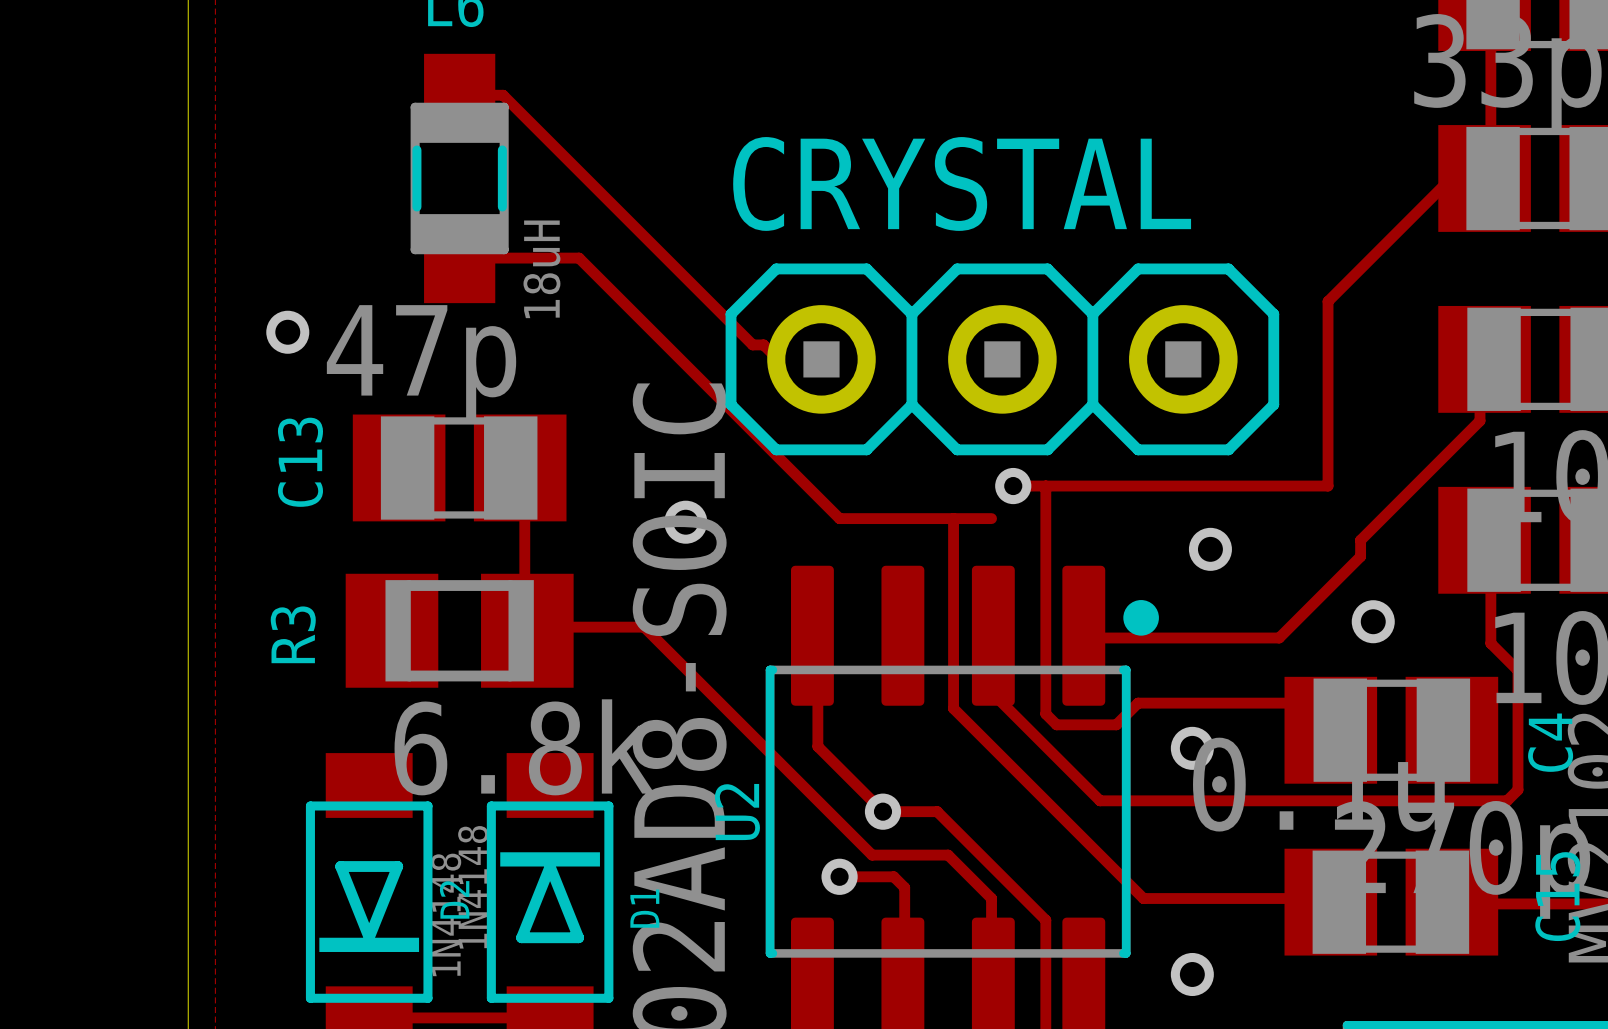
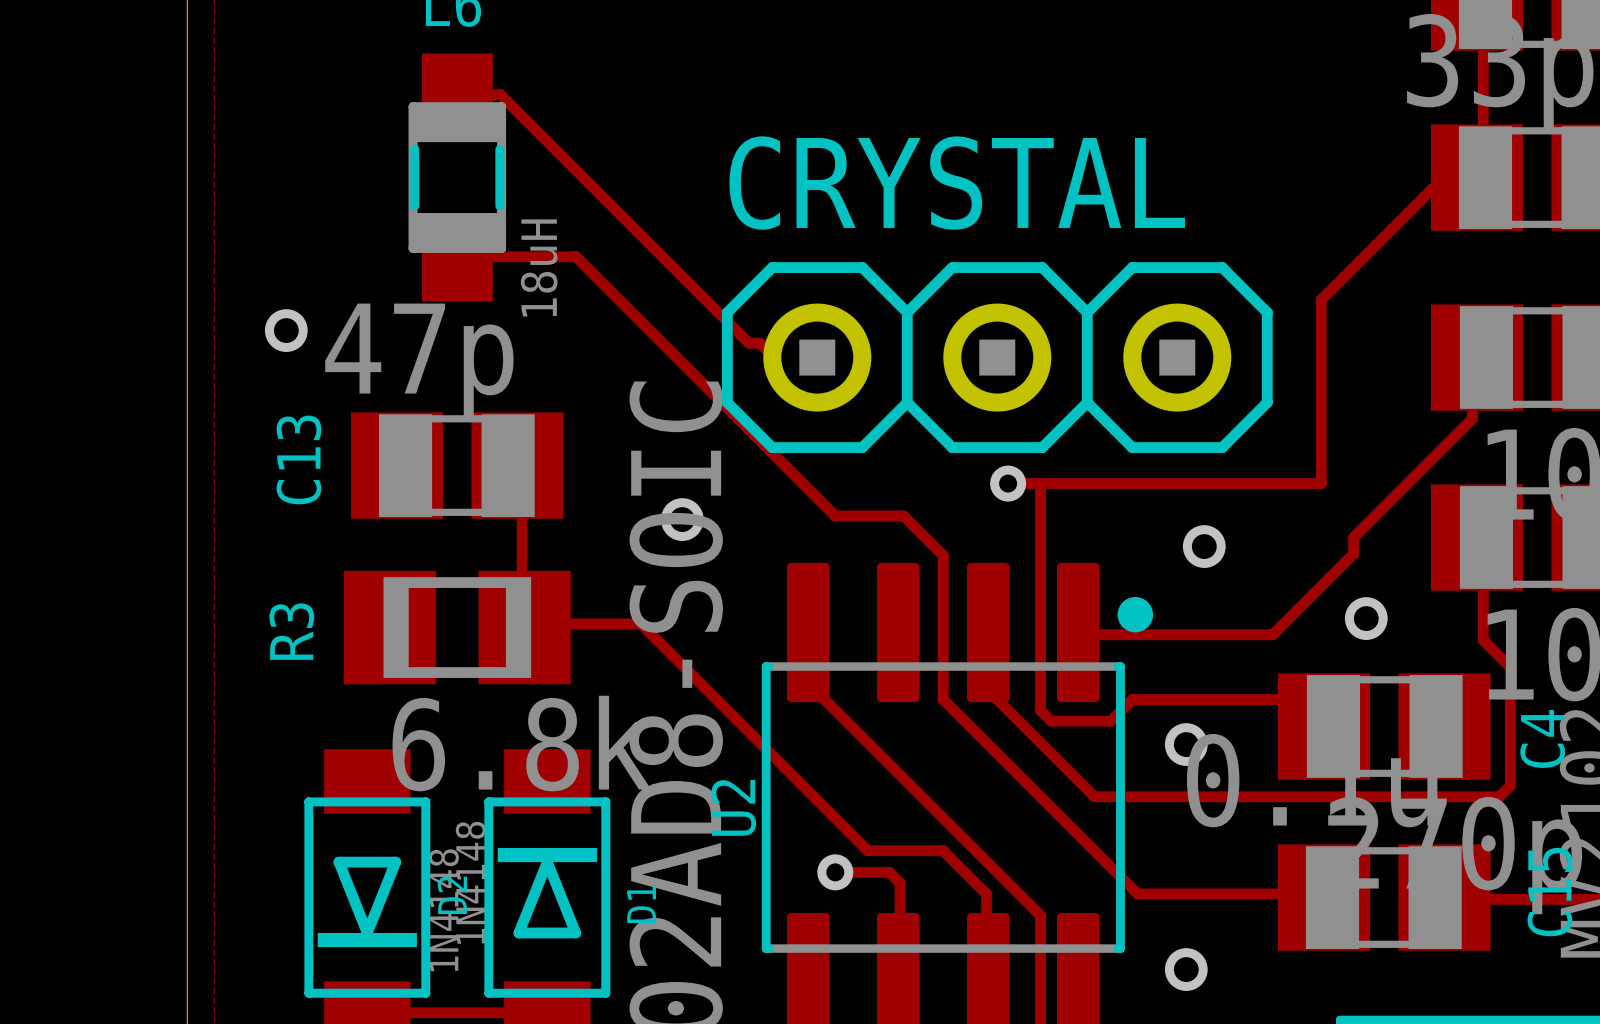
track: (908, 518) (991, 518) -> none
track: (953, 518) (953, 708) -> (903, 515) (943, 555) (943, 699) (948, 704)
track: (817, 692) (817, 746) (882, 811) (937, 811) -> (813, 688) (932, 807)
via: (882, 811) -> none

